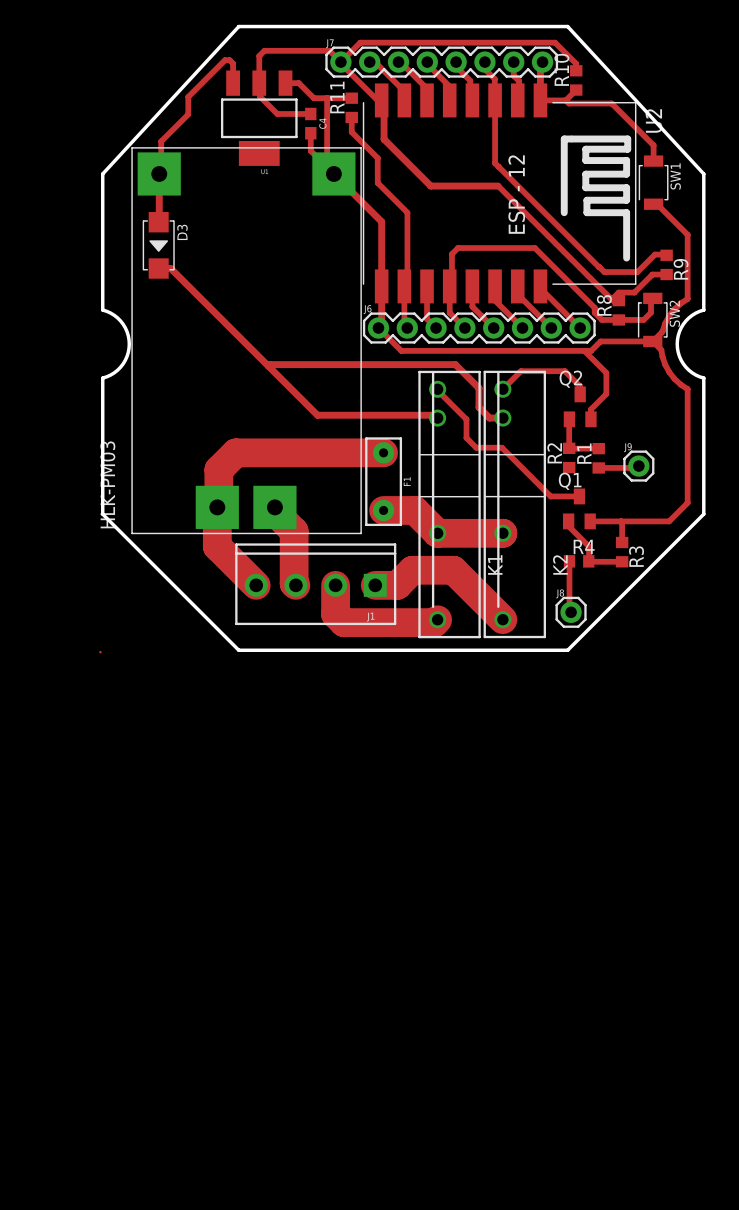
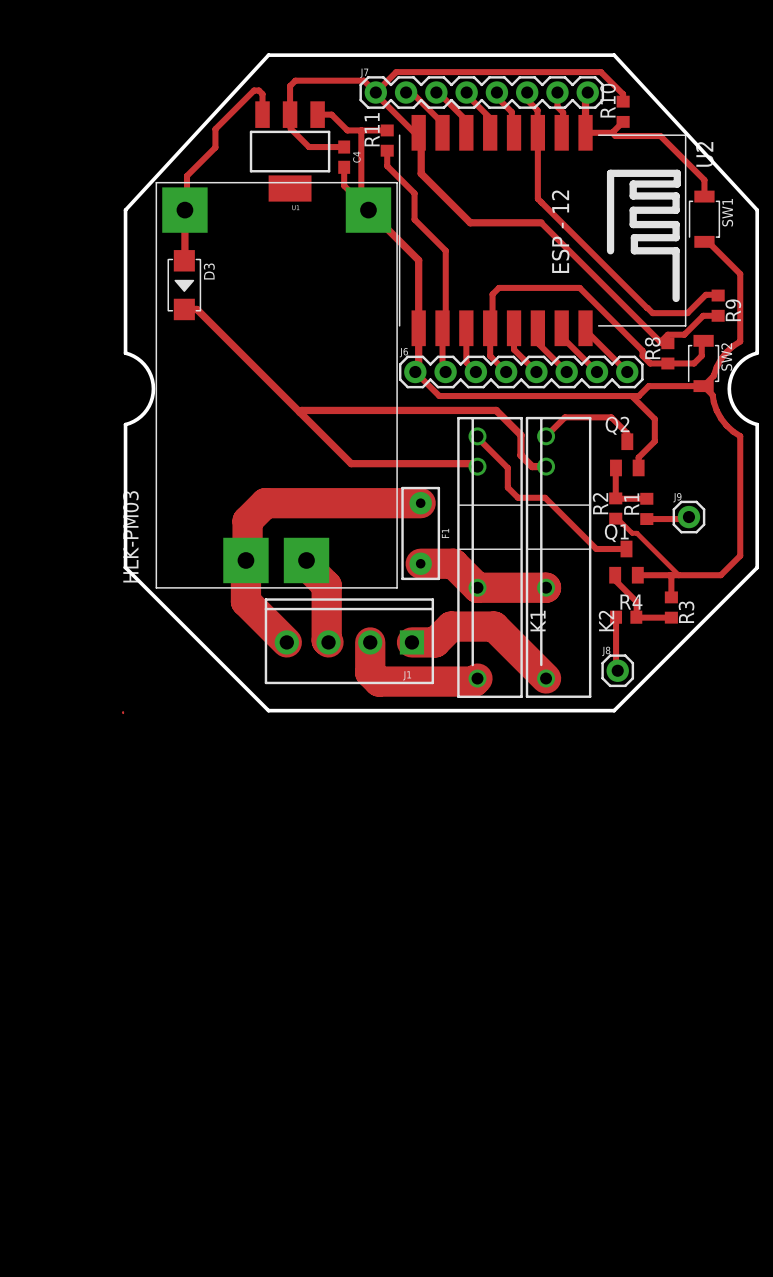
top track: none -> (615, 518) (632, 533) (636, 533) (678, 575)

